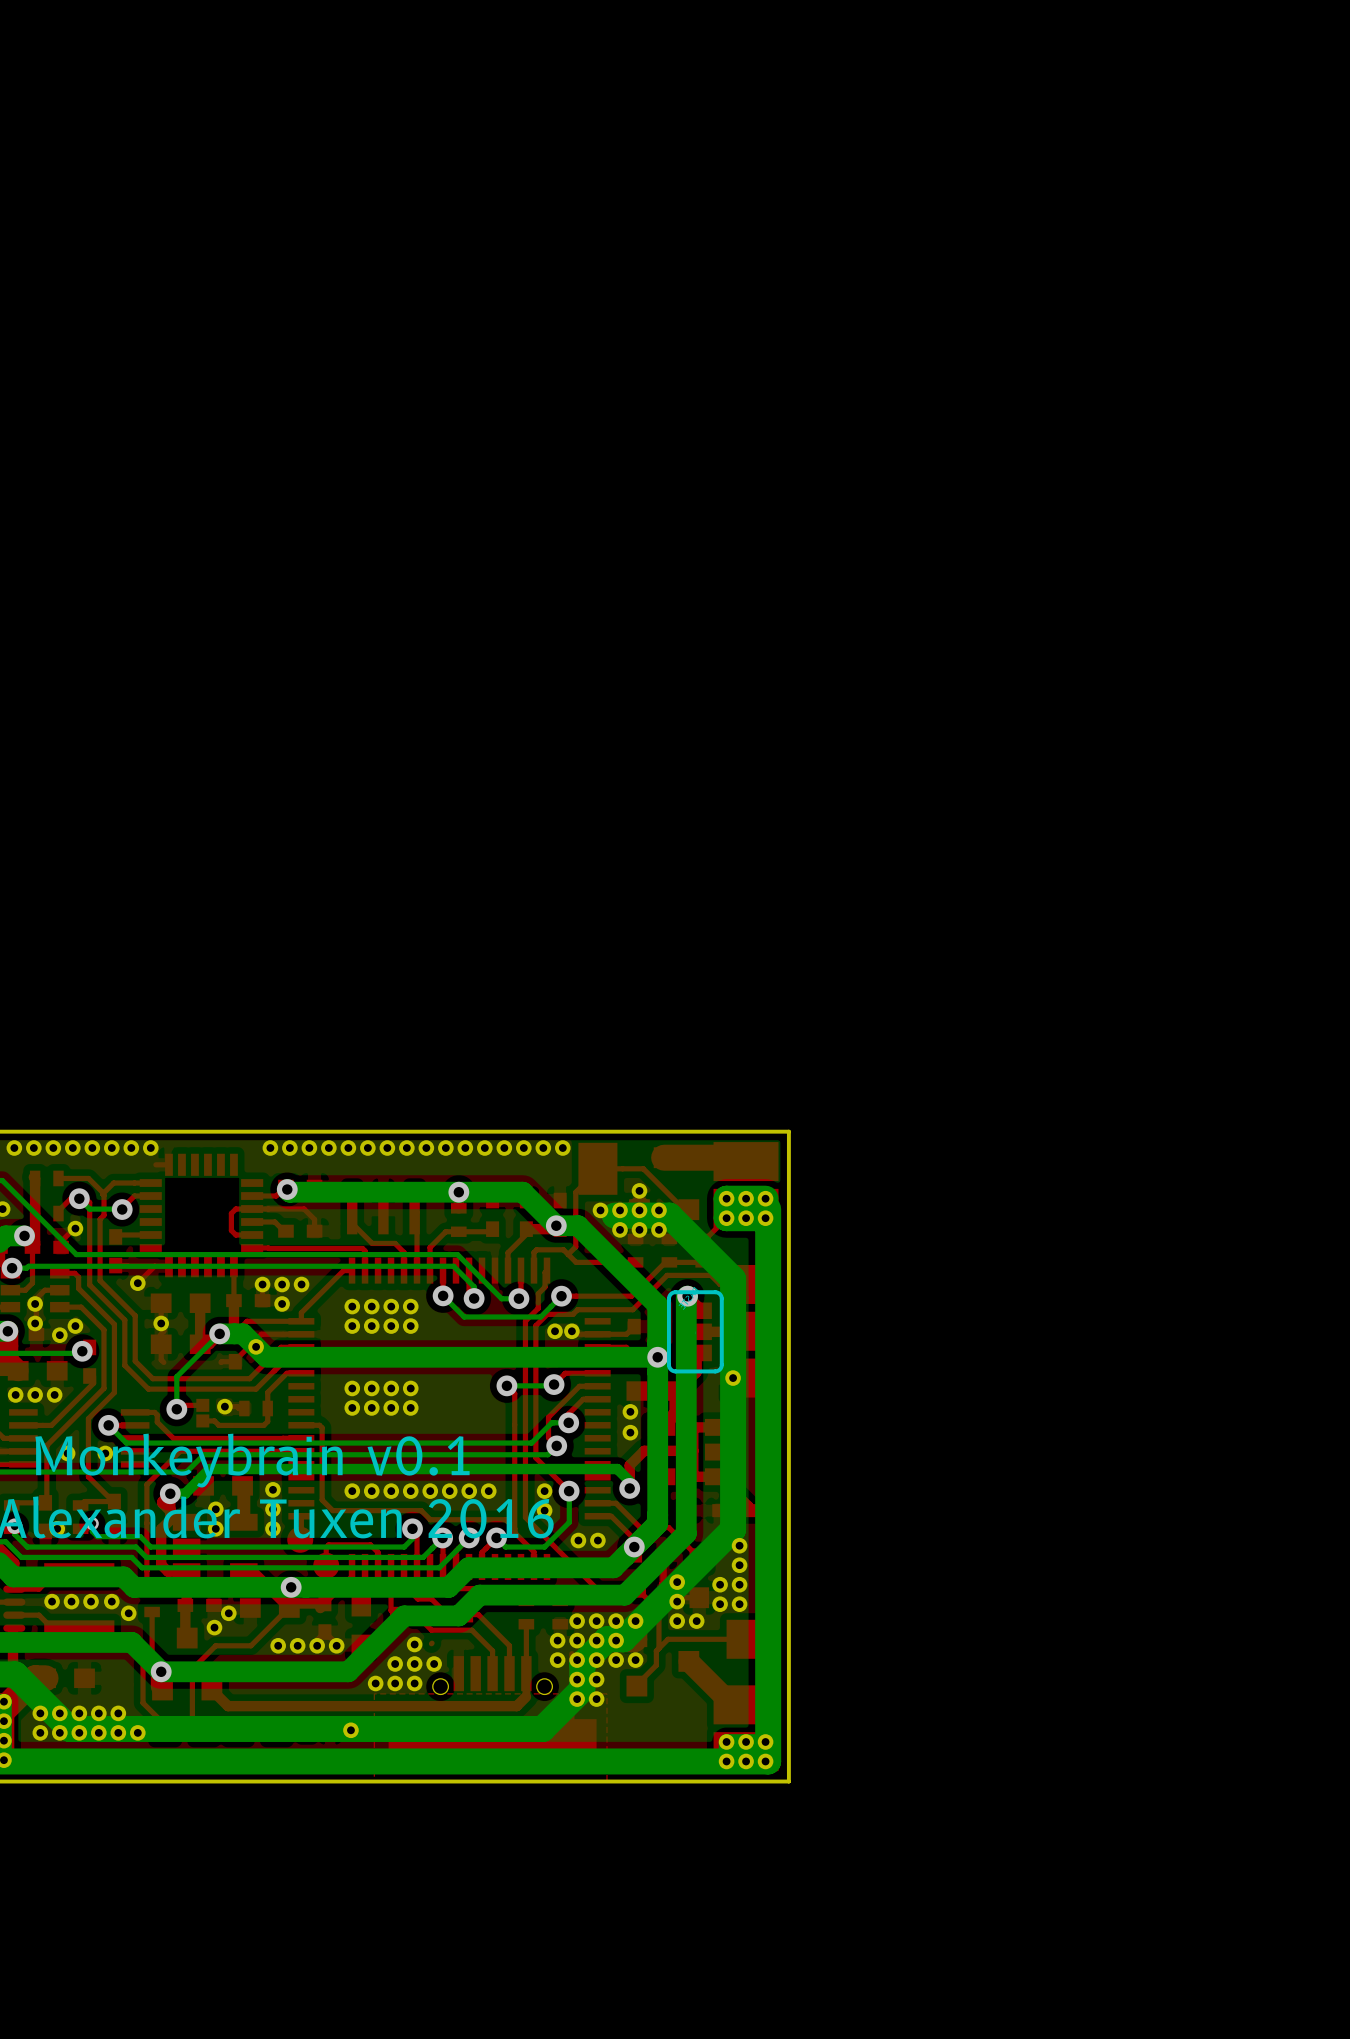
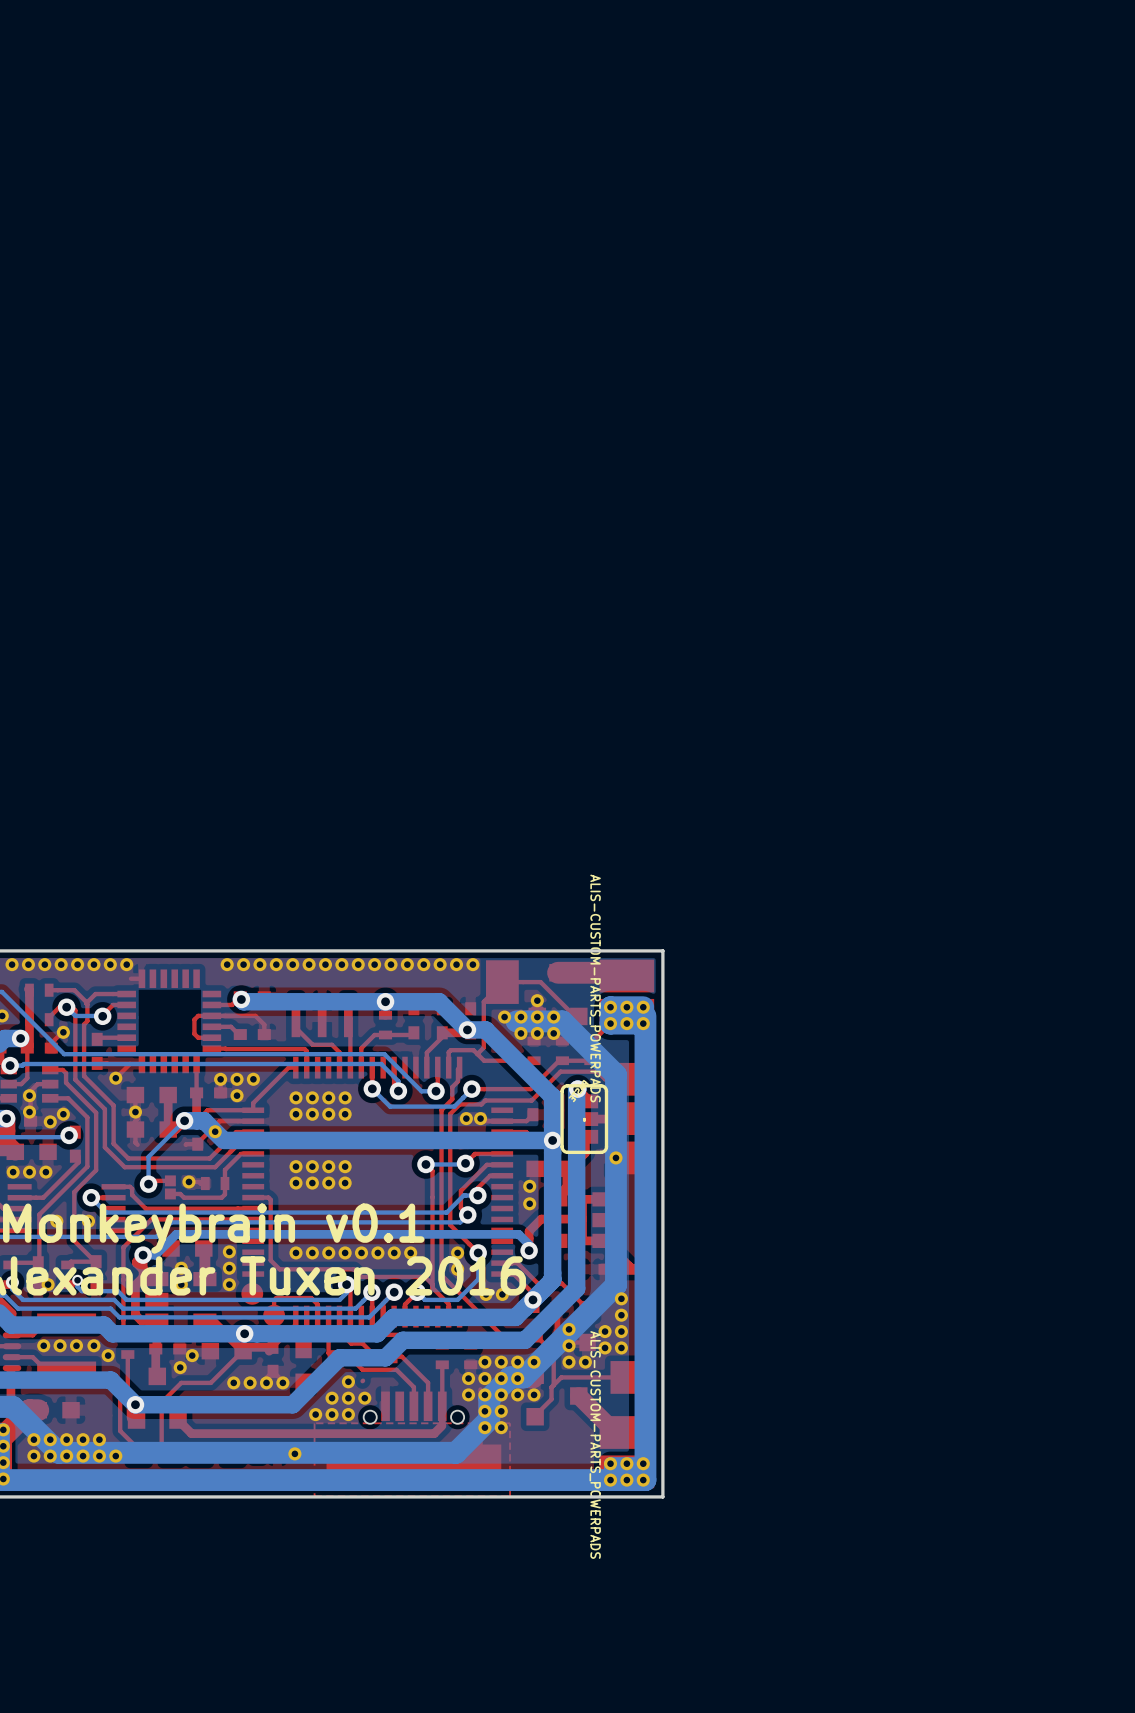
part value: none -> ALIS-CUSTOM-PARTS_POWERPADS (595, 988)
part value: none -> ALIS-CUSTOM-PARTS_POWERPADS (595, 1444)

